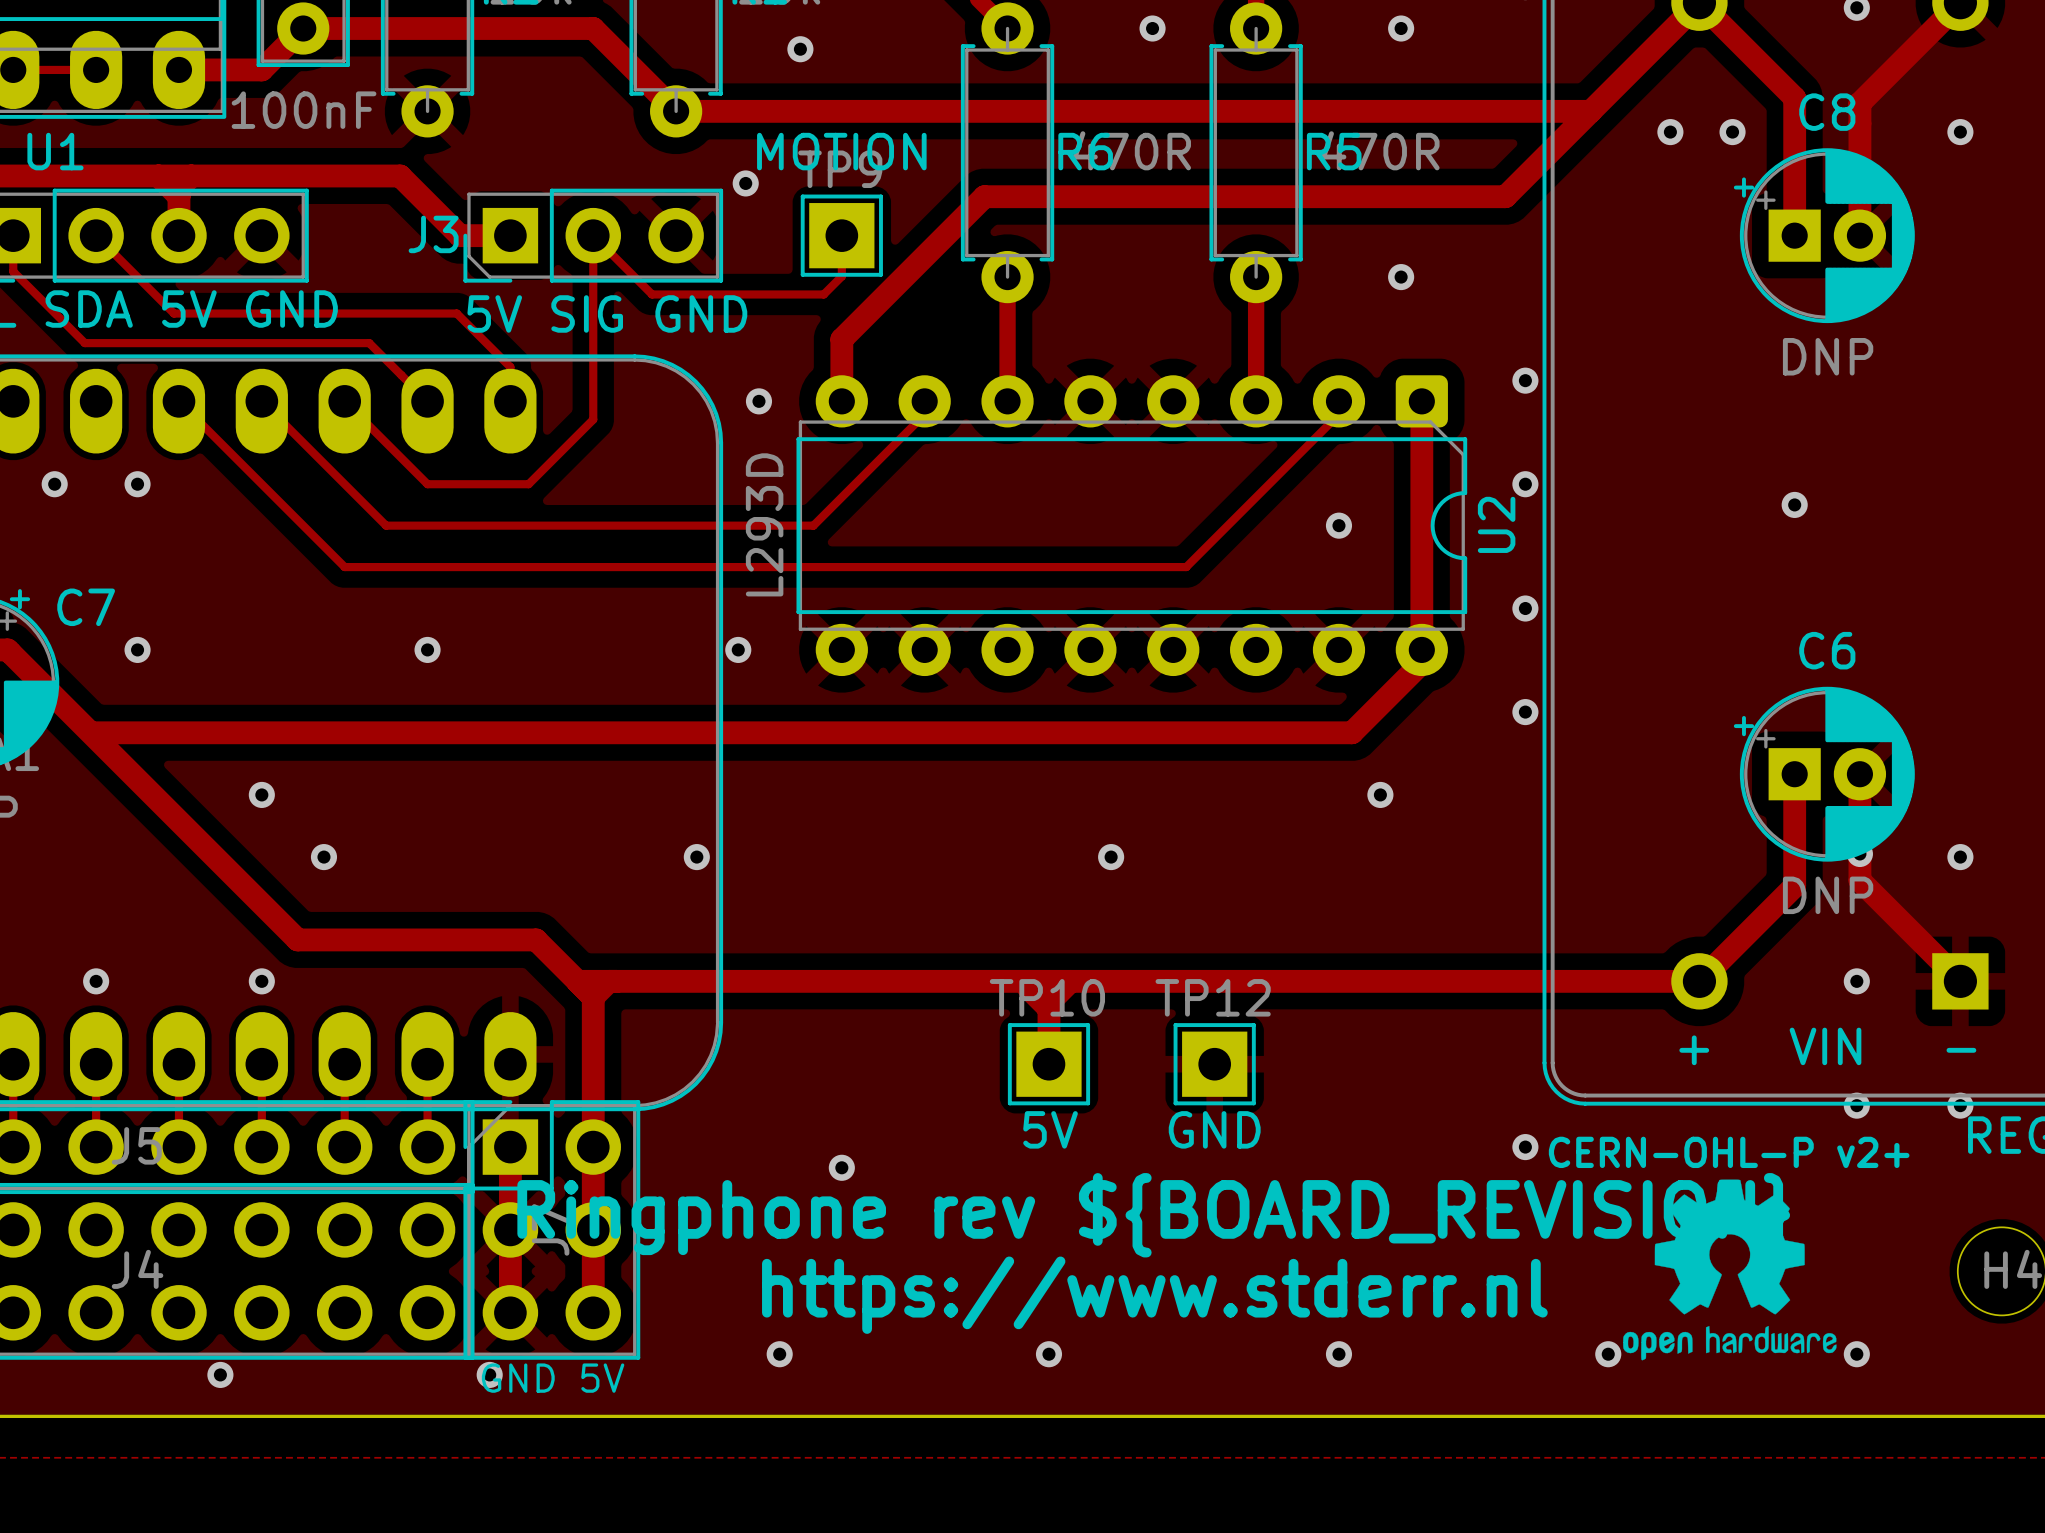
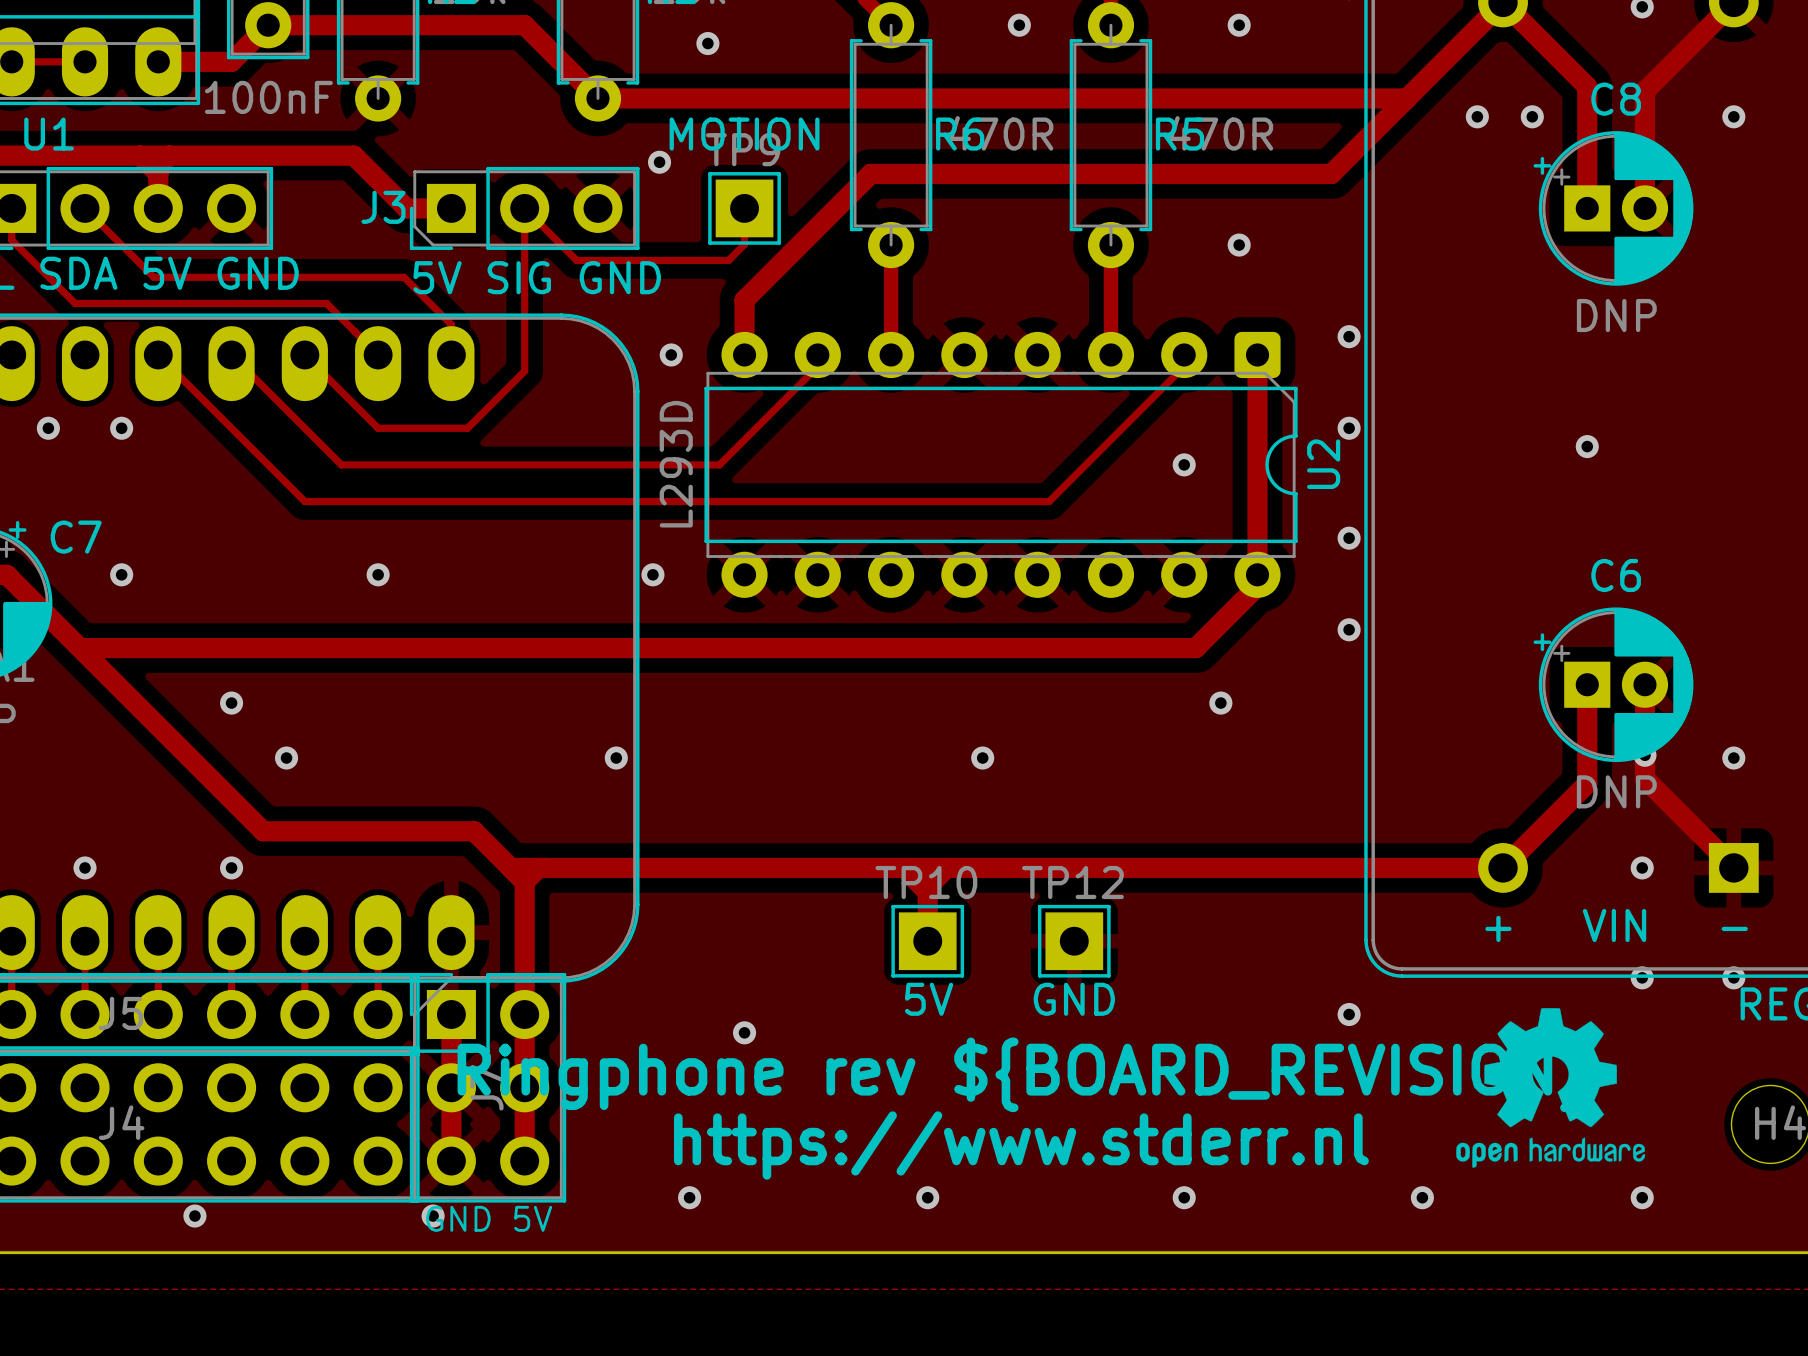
text: CERN-OHL-P v2+ (1729, 1152) -> none
drawing position: (1729, 1269) -> (1550, 1087)

